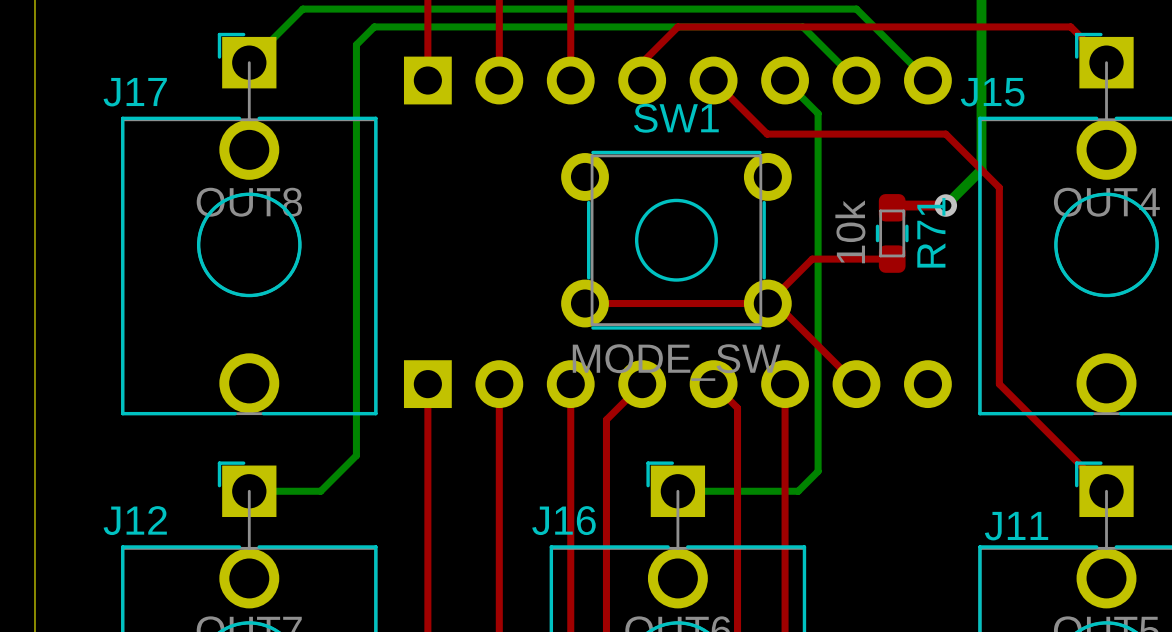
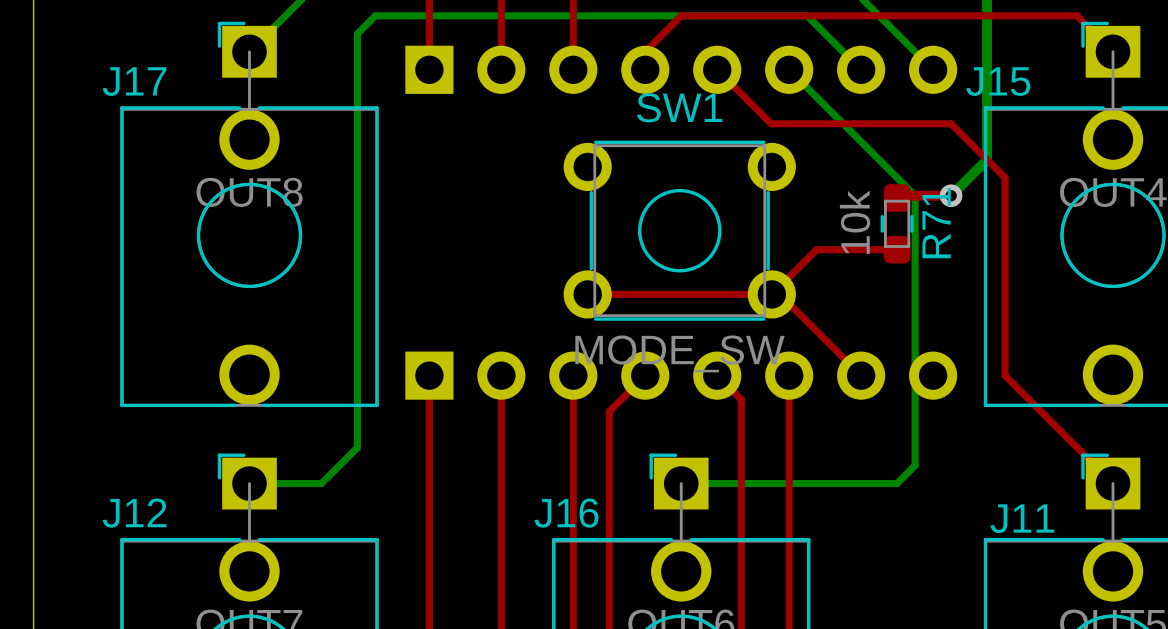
bottom track: (818, 113) (818, 471) (798, 491) -> (822, 103) (915, 195) (915, 465) (897, 483) (802, 483)

